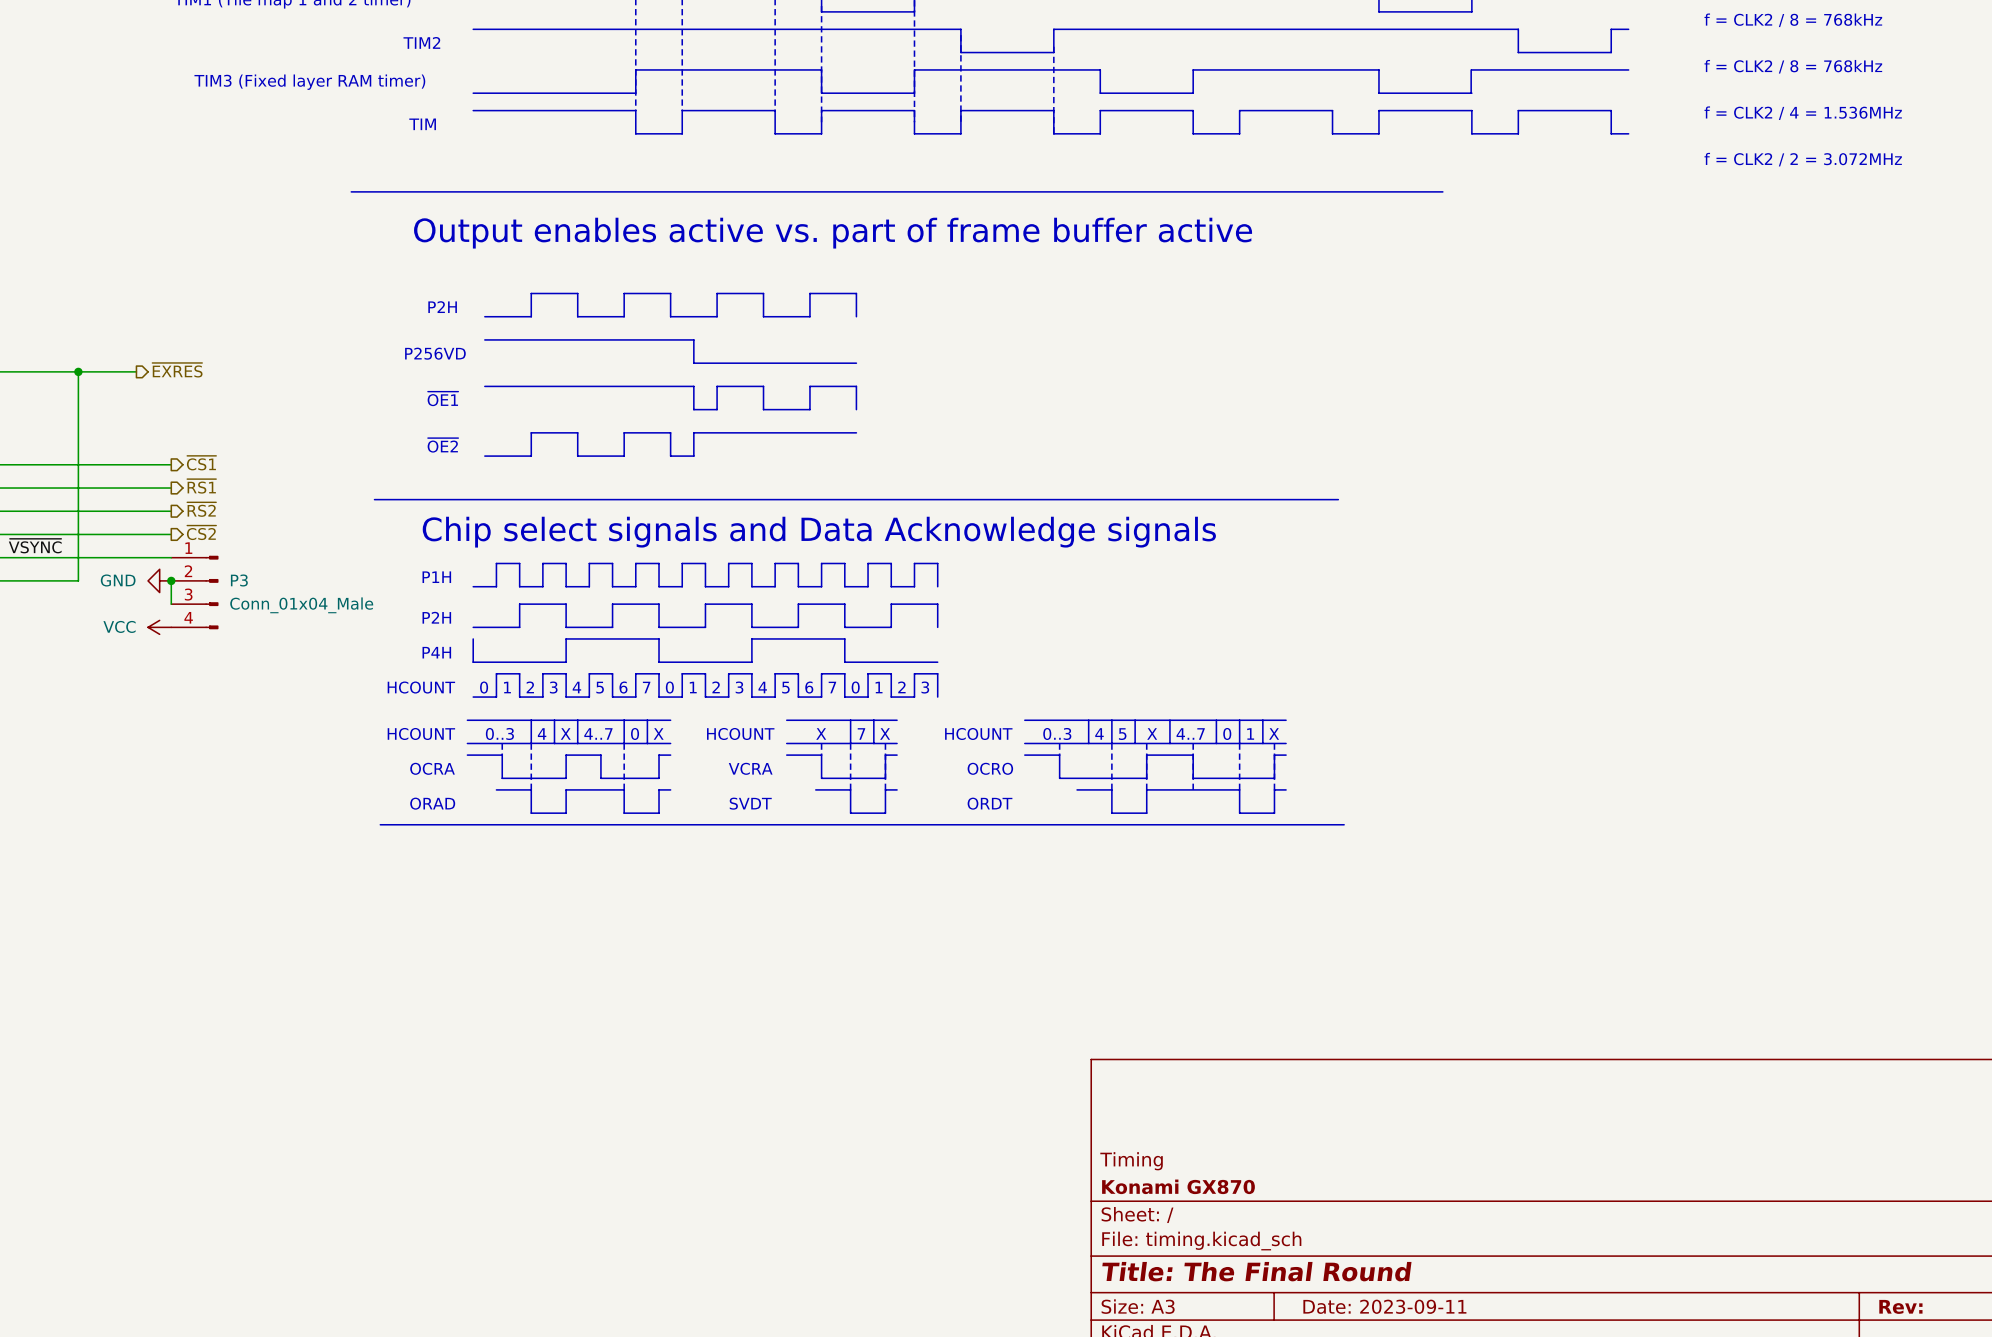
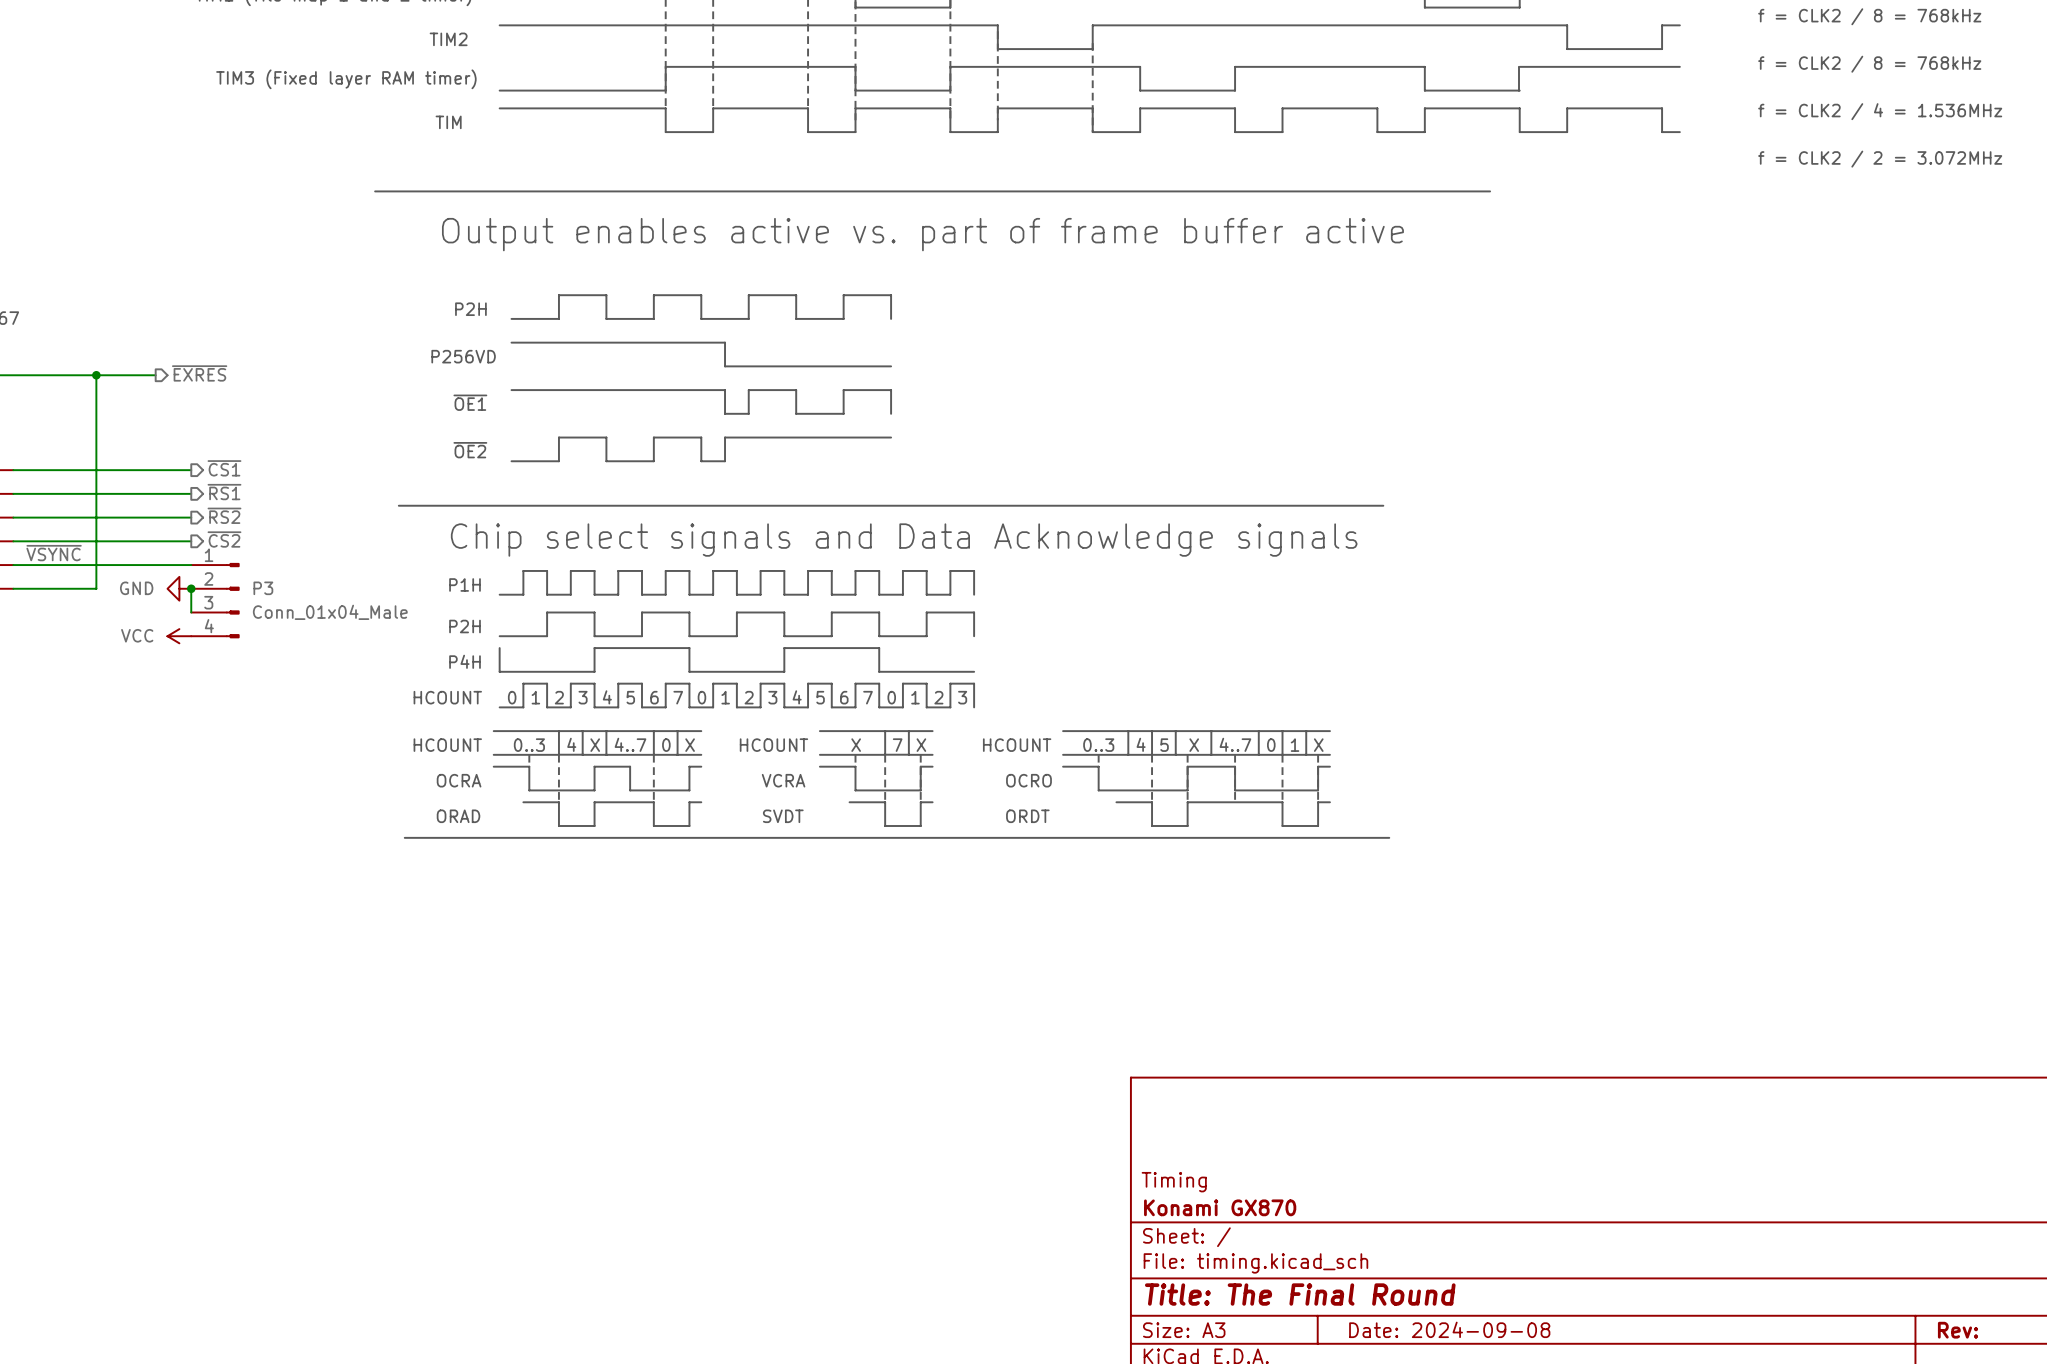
title block: Date: 2023-09-11 (1384, 1306) -> Date: 2024-09-08 (1449, 1329)

